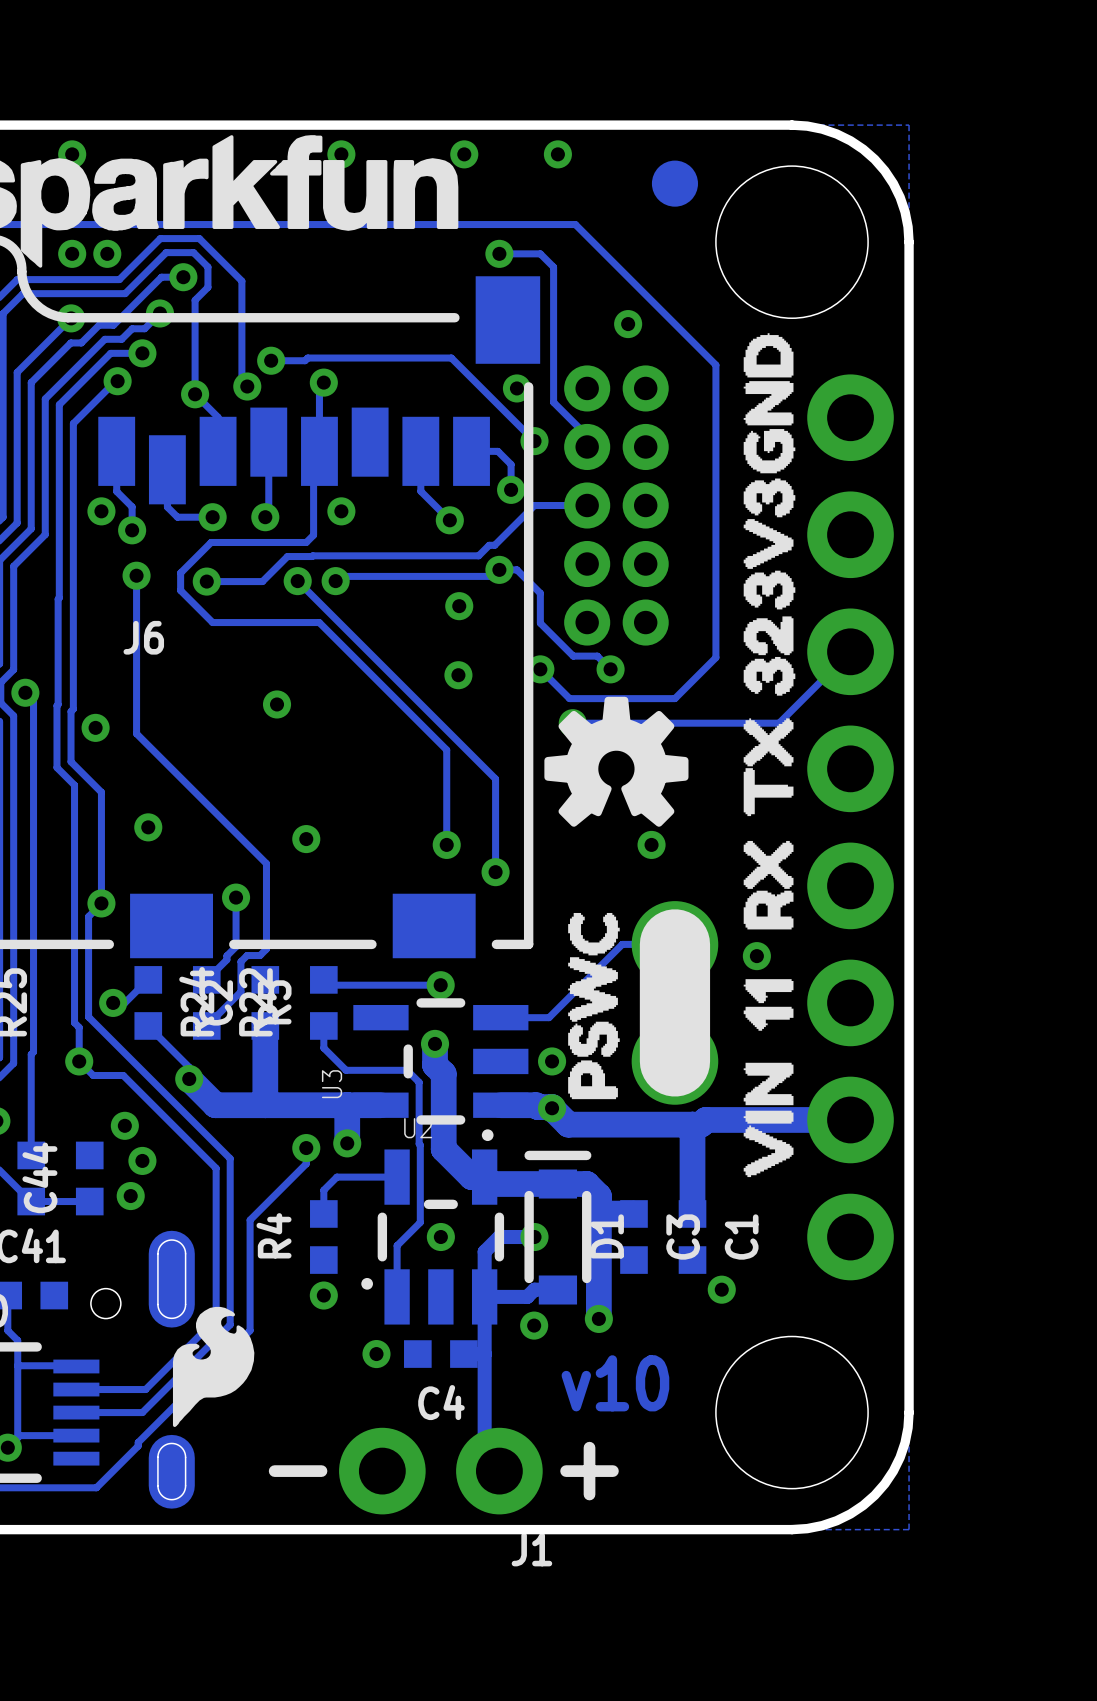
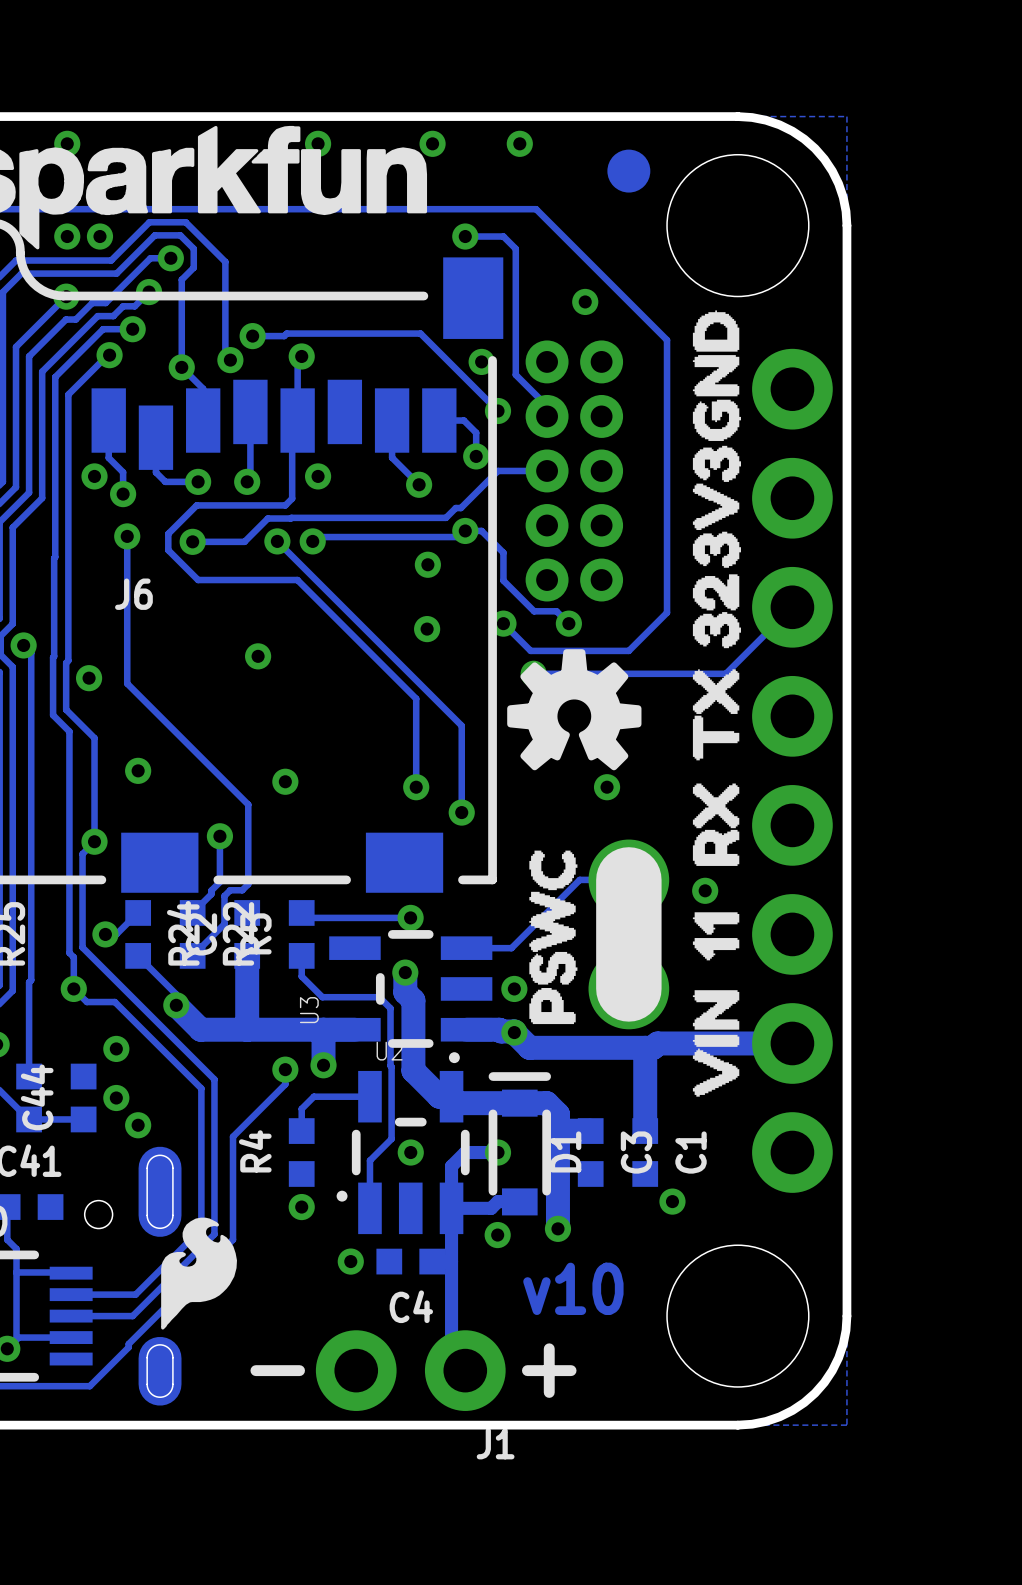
via: (142, 1160) -> none
via: none -> (116, 1098)
via: (130, 1196) -> none
via: none -> (138, 1125)

